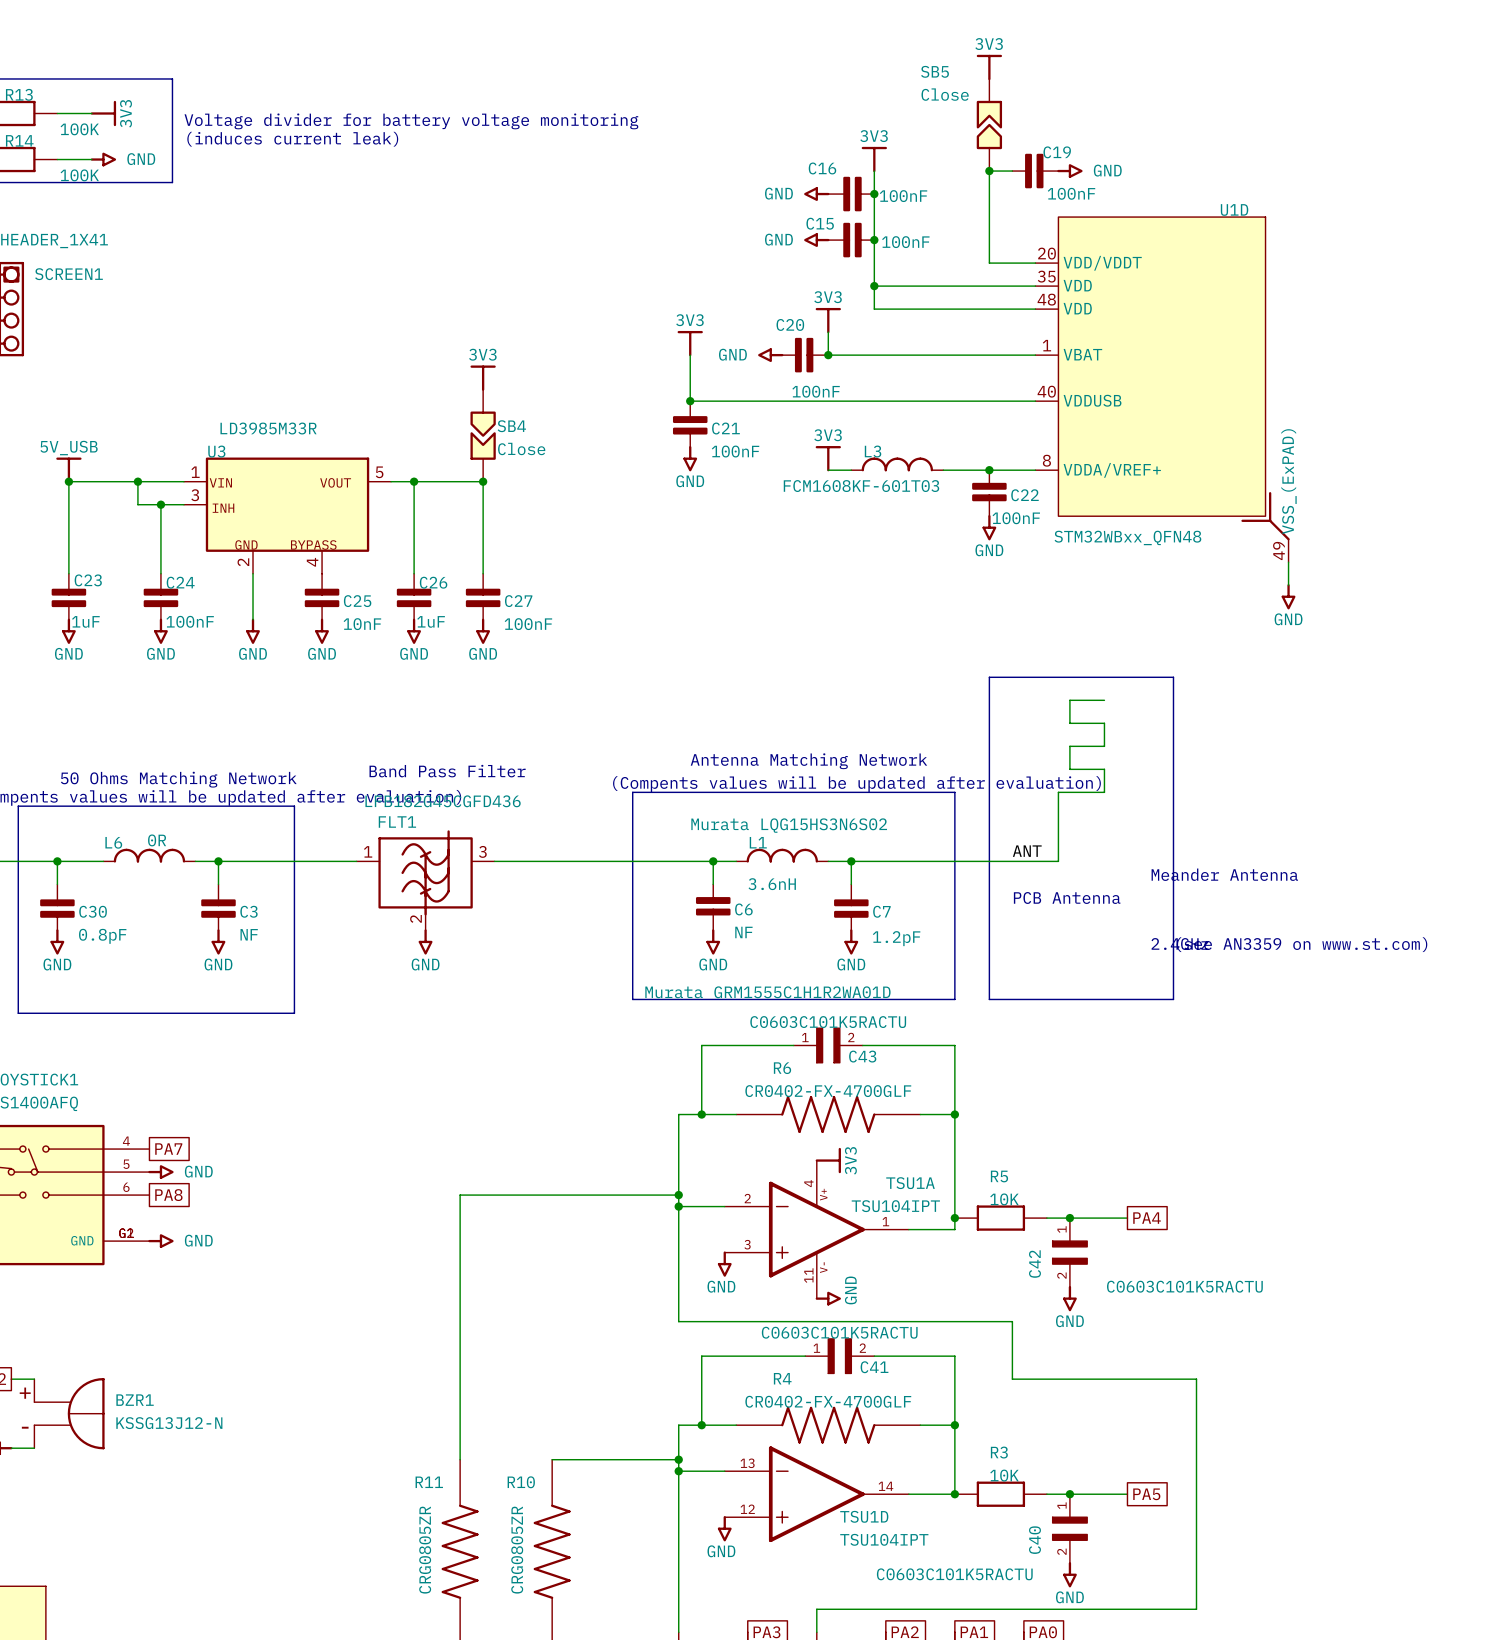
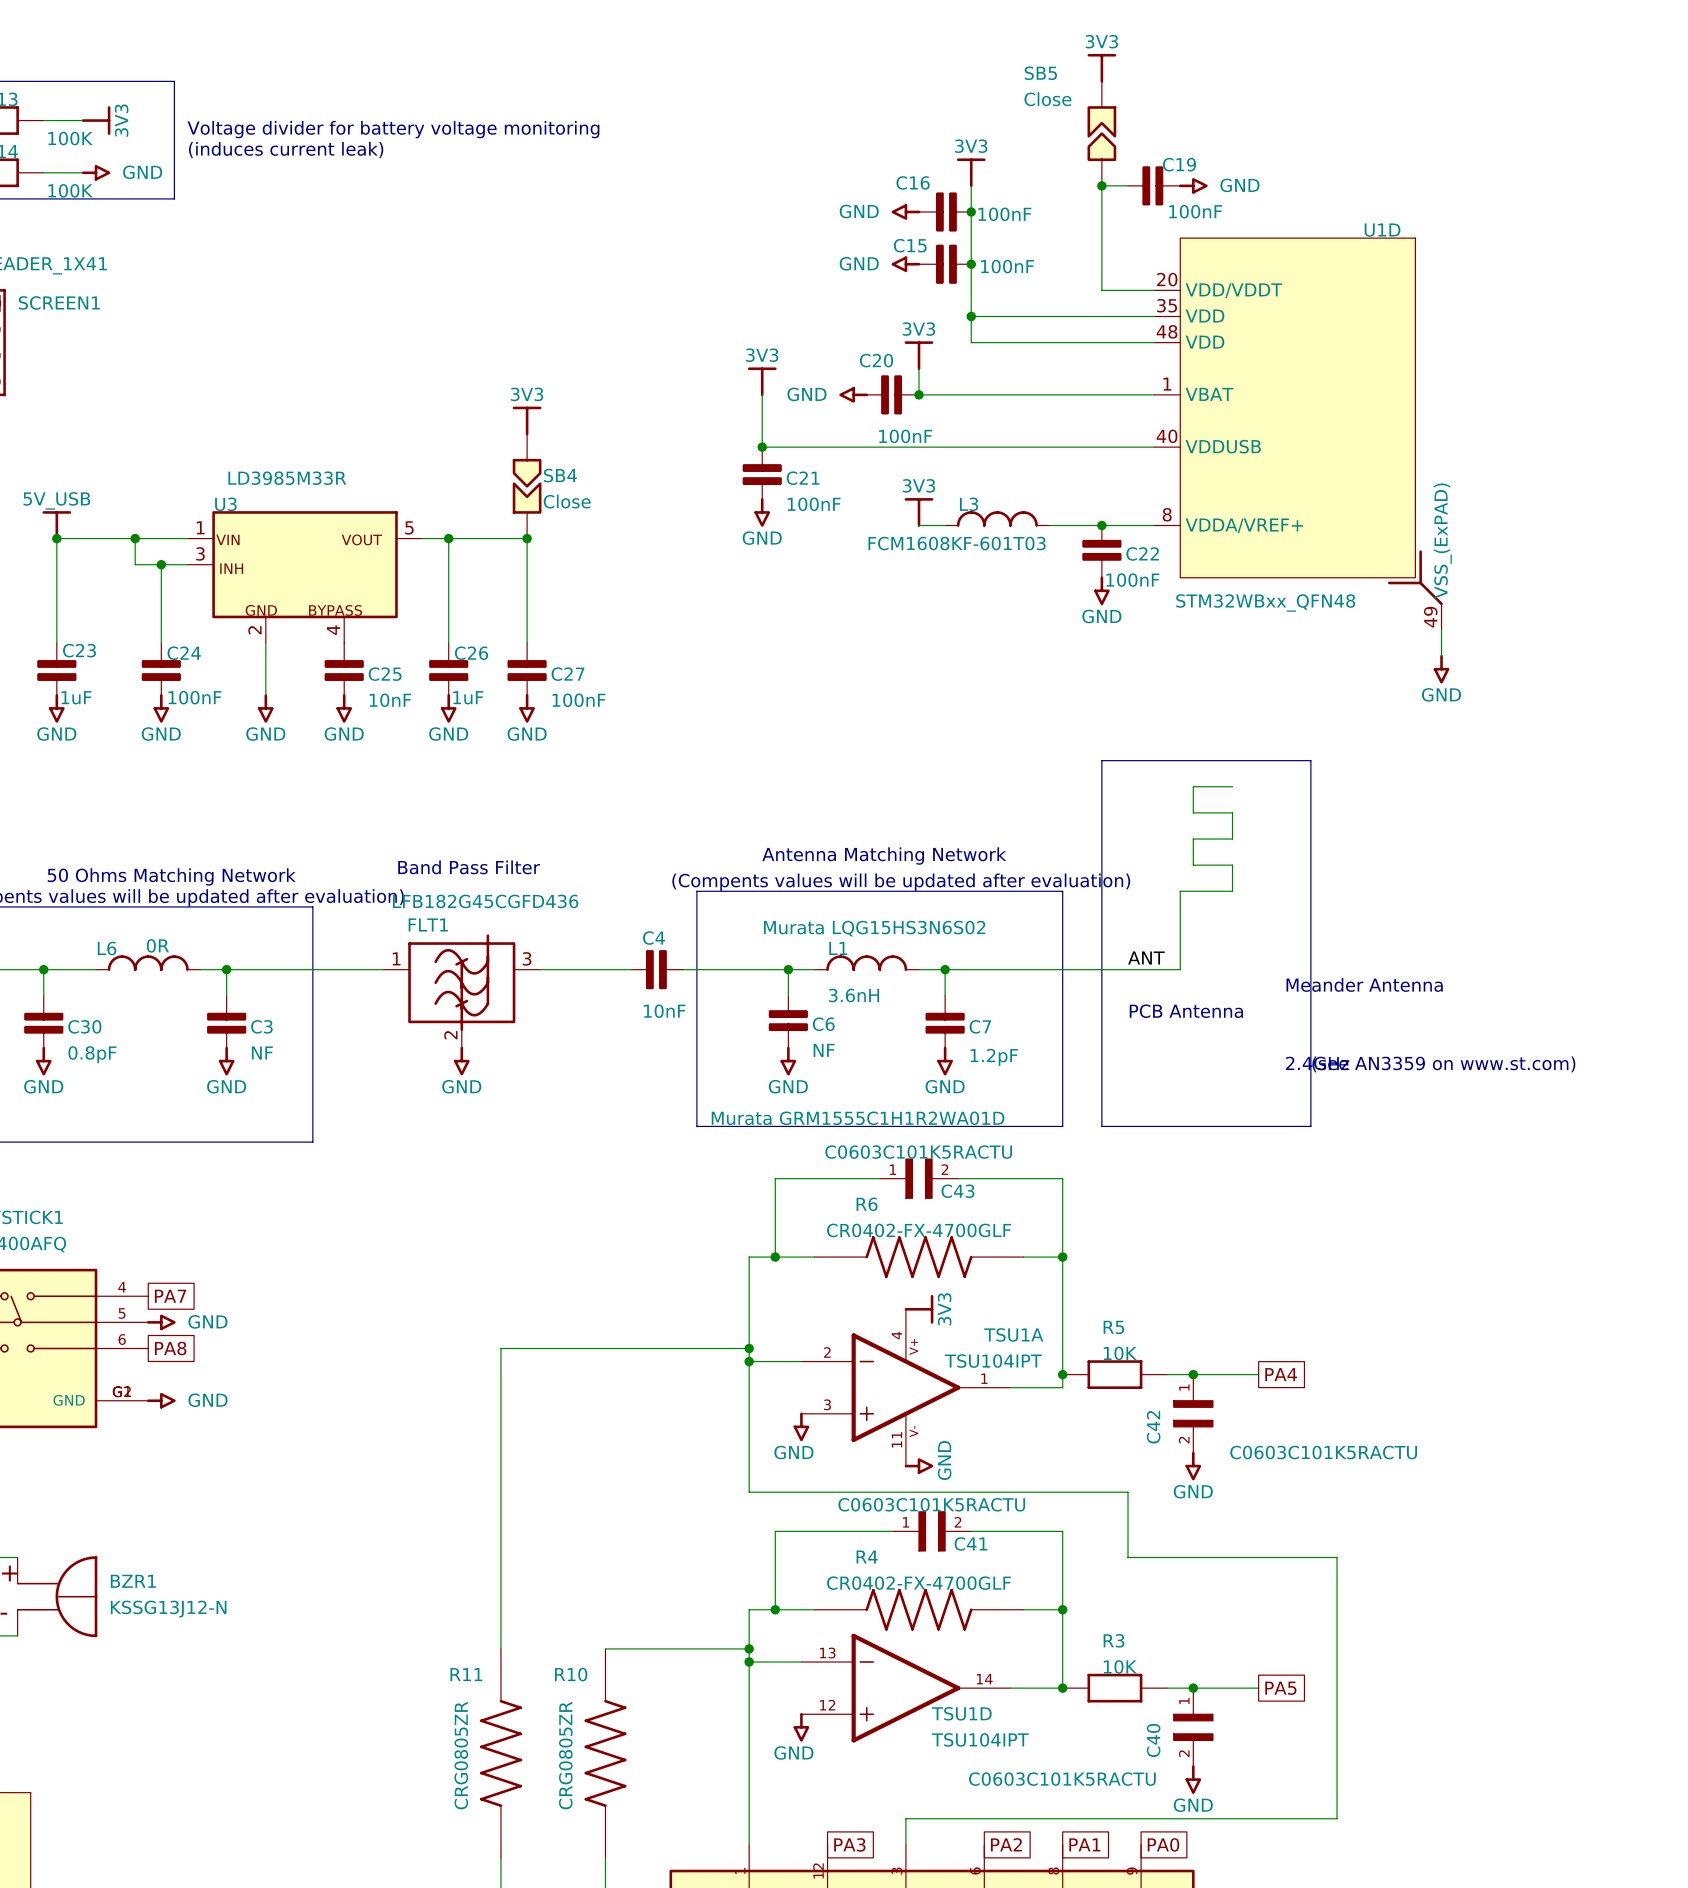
C4: none -> 10nF (657, 969)

